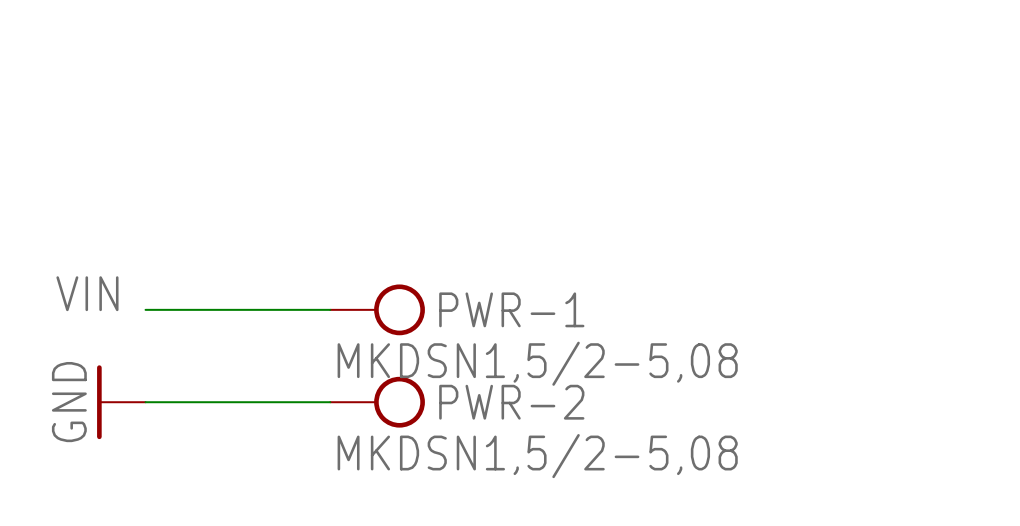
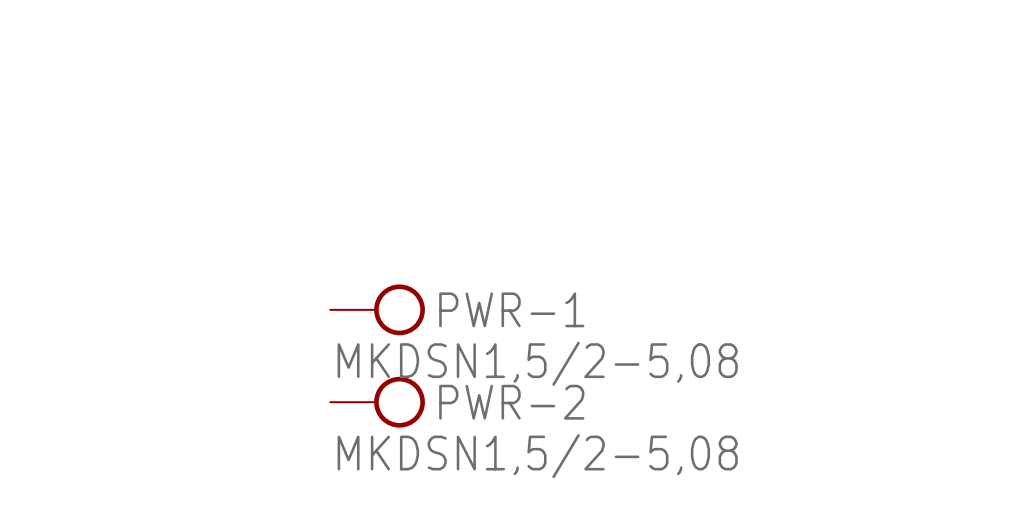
label: VIN (87, 293) -> none
wire: (145, 309) (330, 309) -> none
power symbol: GND (121, 402) -> none
wire: (145, 402) (330, 402) -> none

